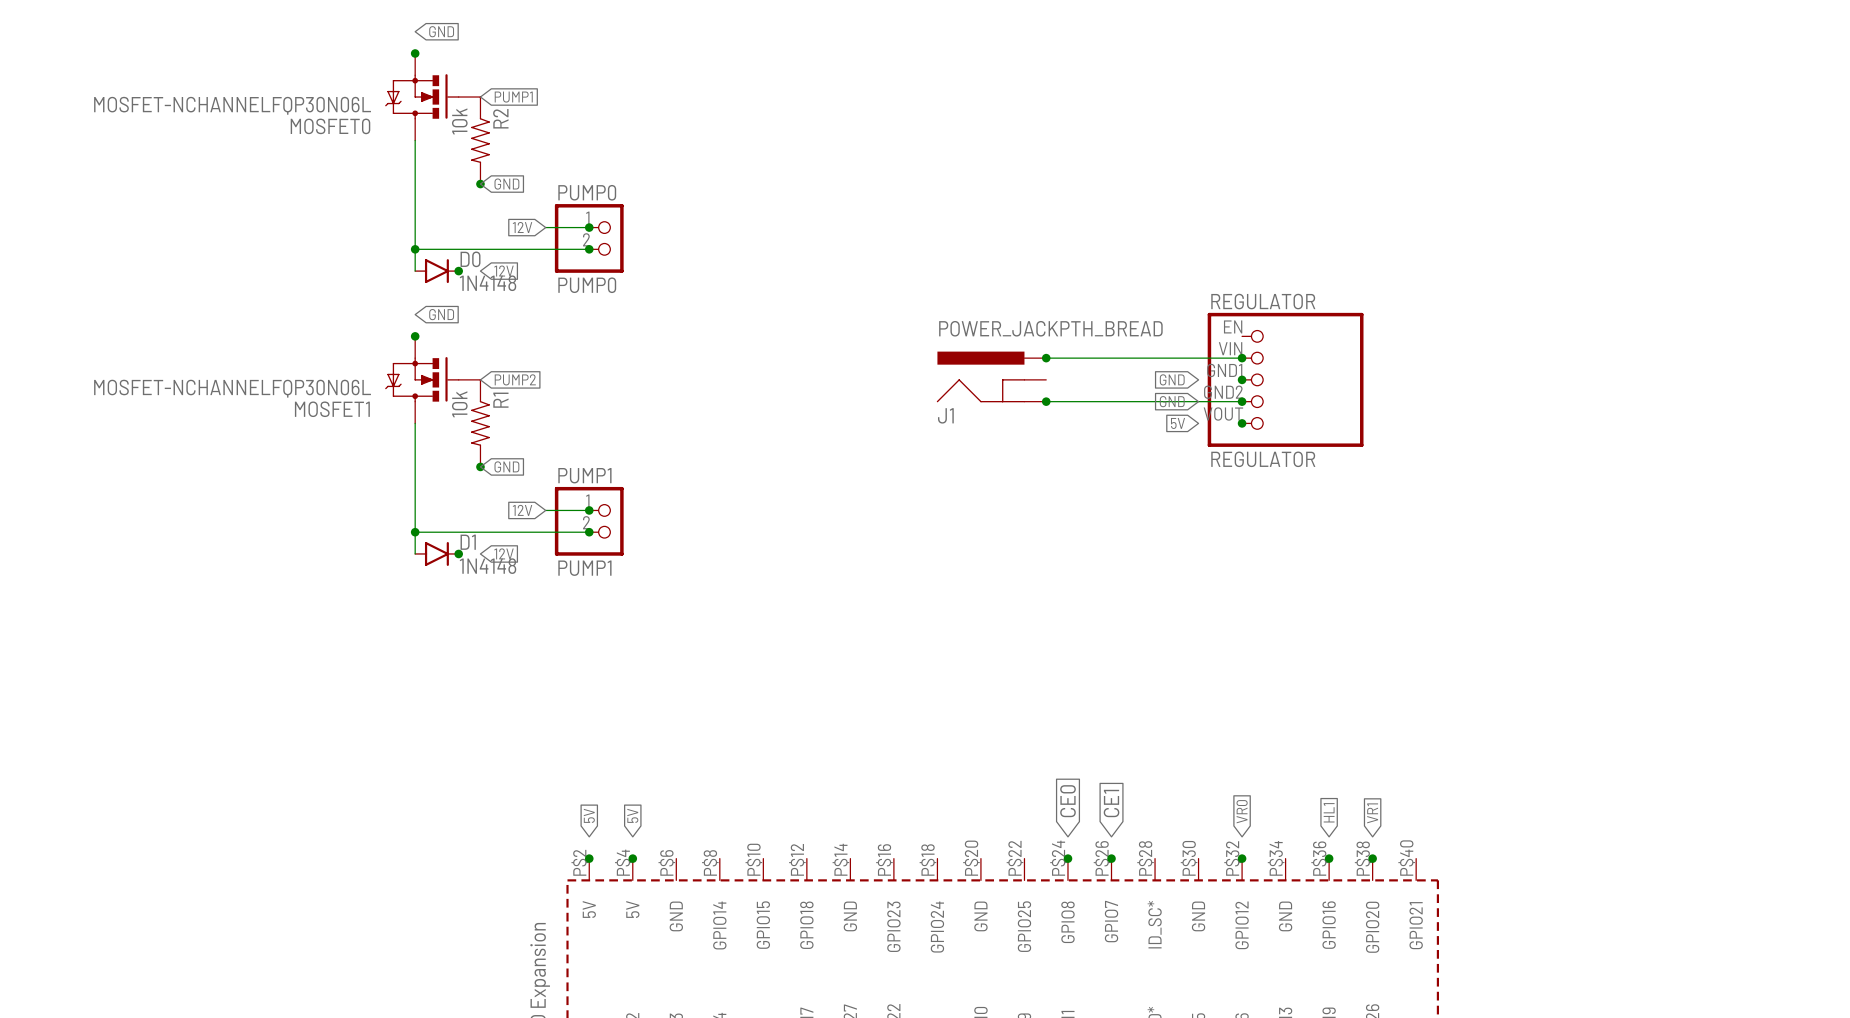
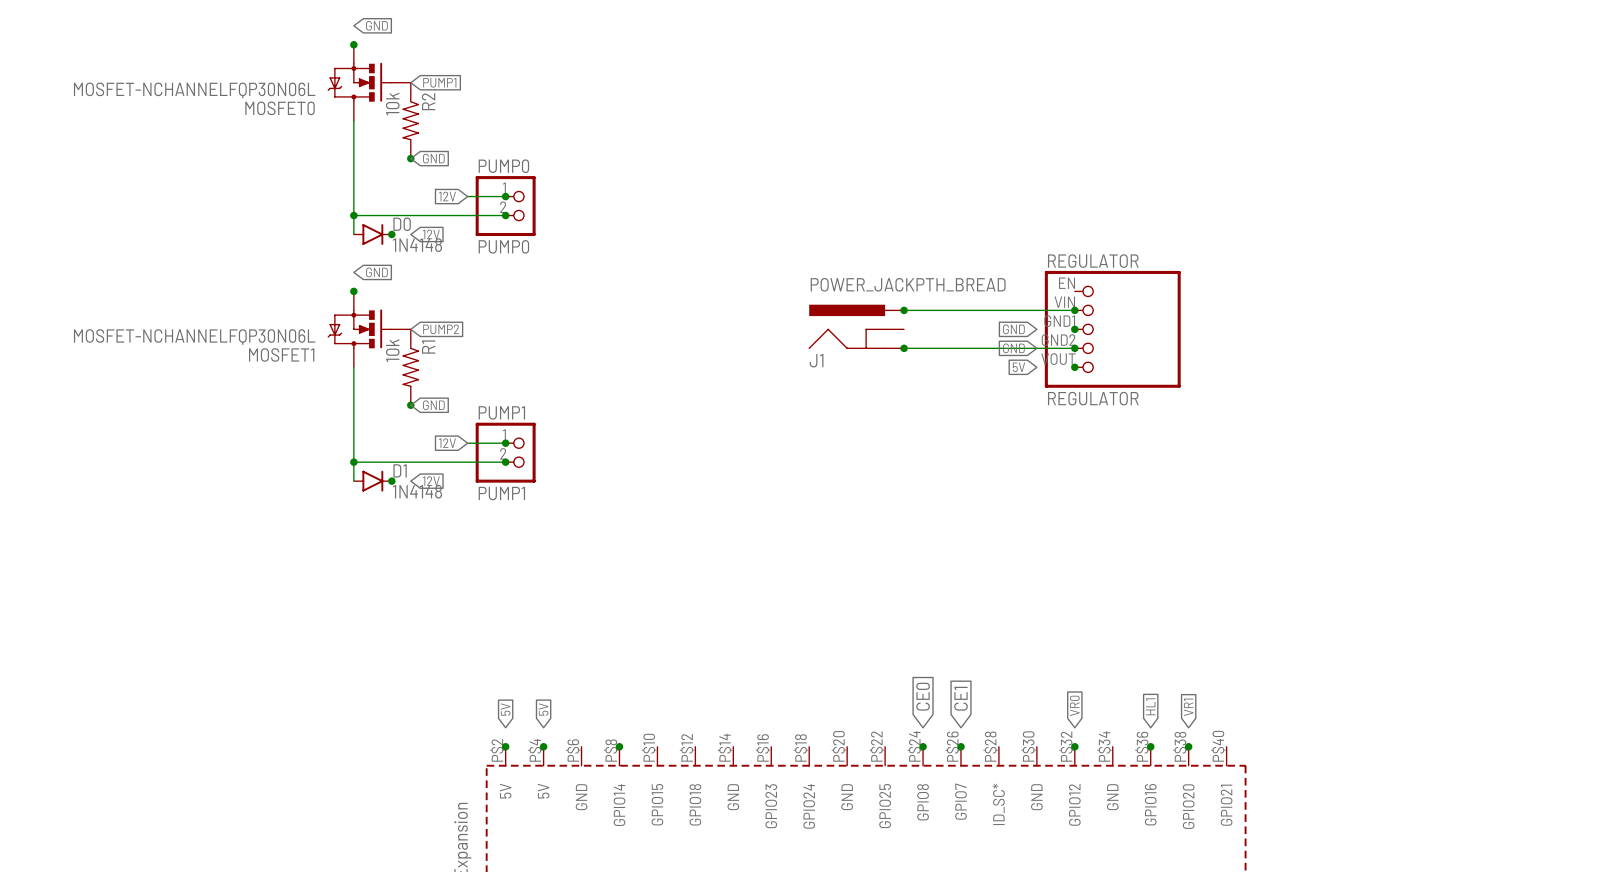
junction: none -> (619, 746)

